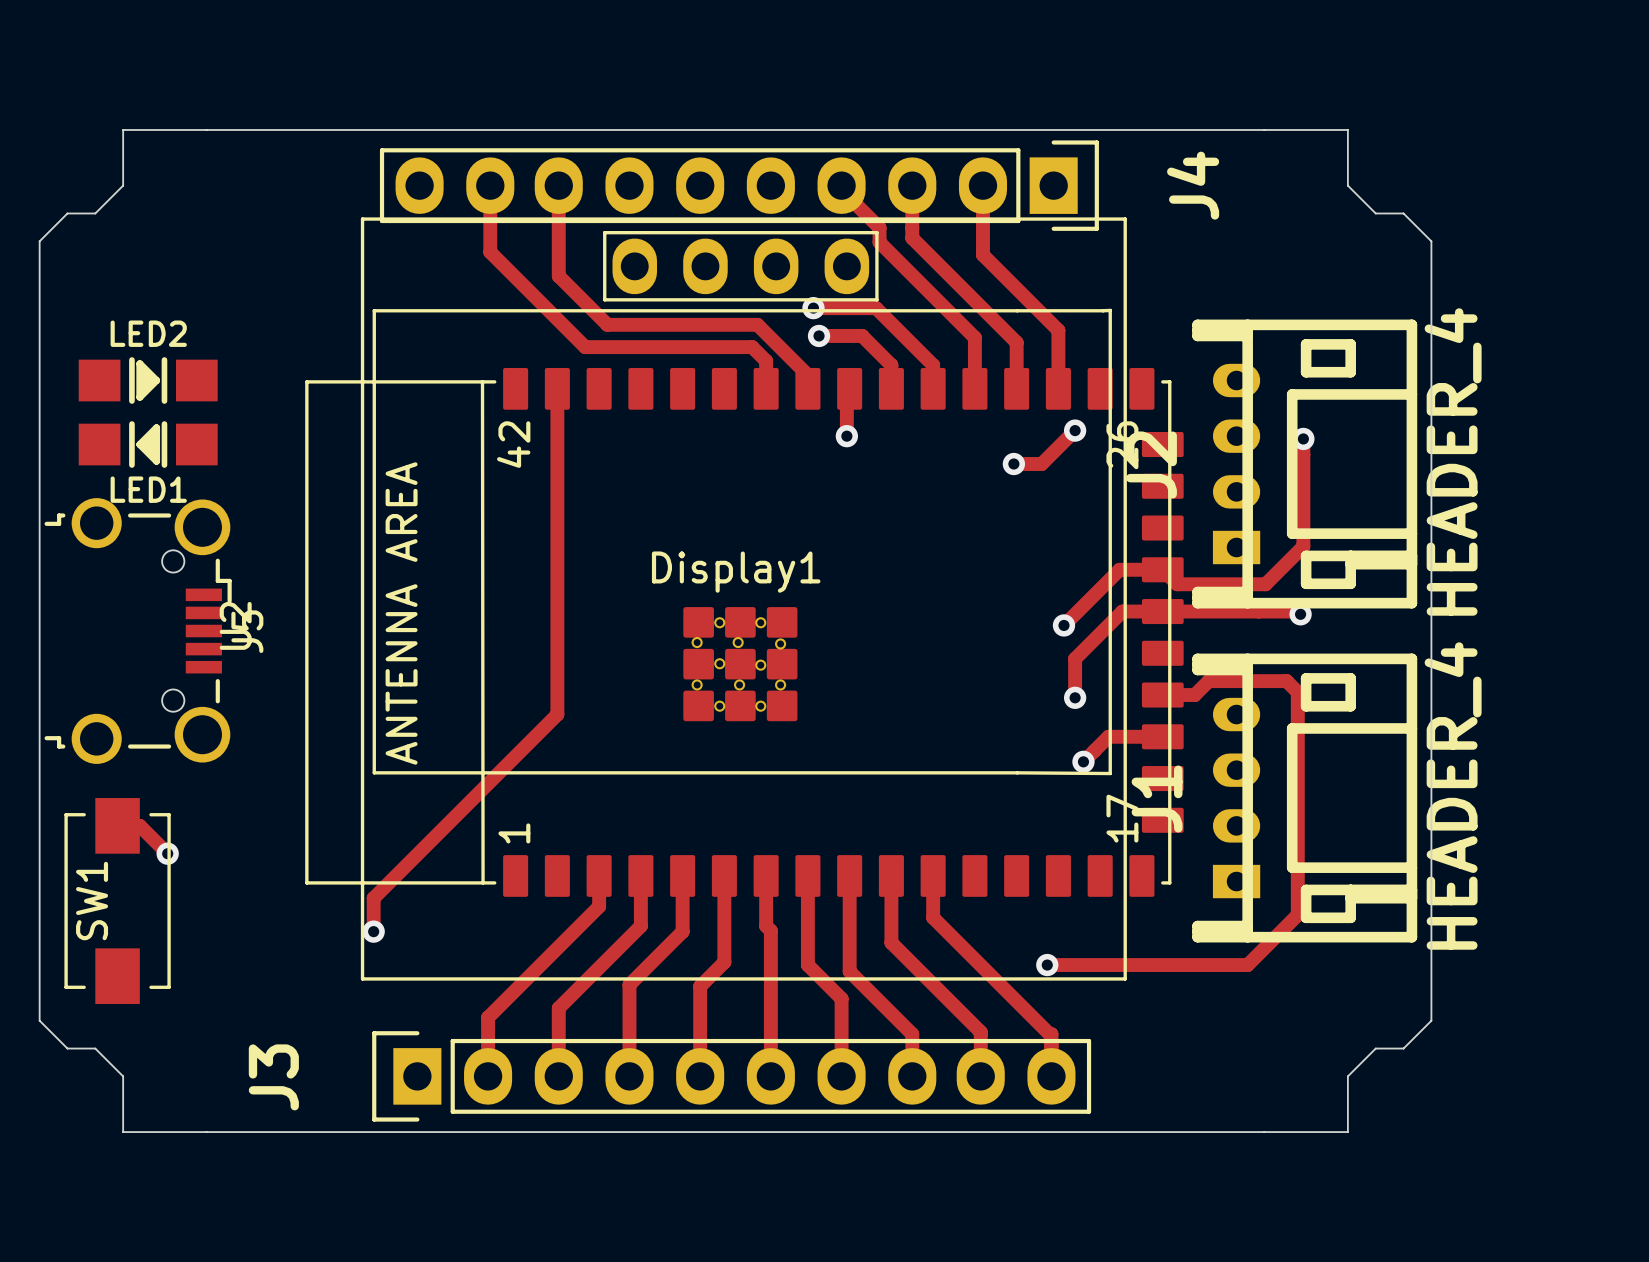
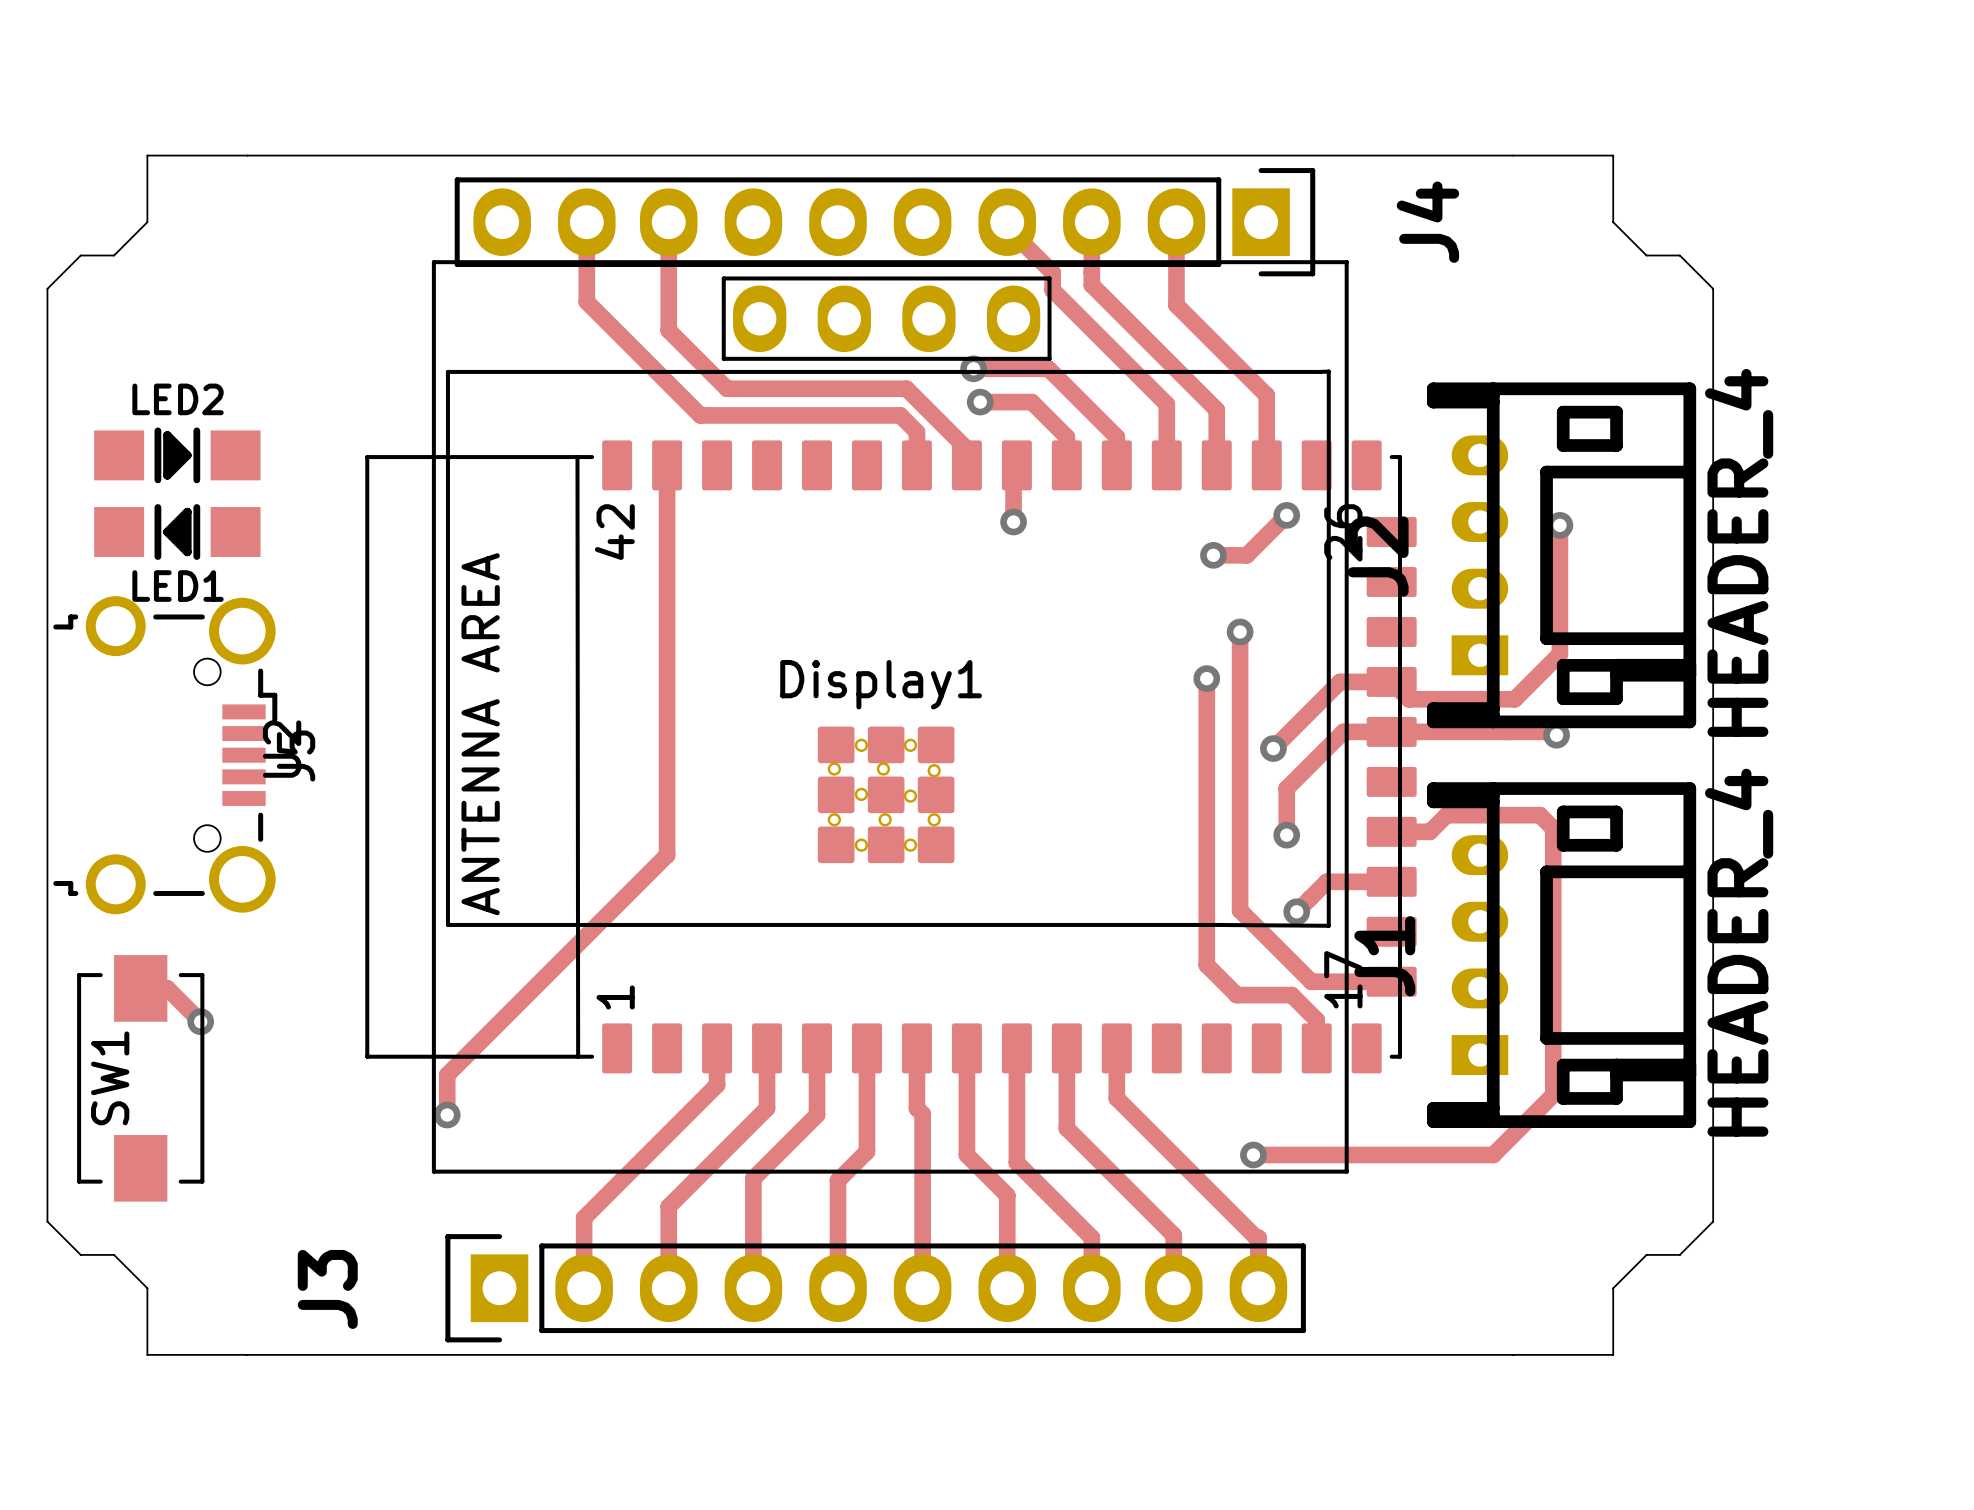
track: none -> (1240, 631) (1240, 910) (1311, 981) (1391, 981)
via: none -> (1240, 631)
track: none -> (1206, 678) (1206, 965) (1236, 995) (1291, 995) (1316, 1020) (1316, 1048)
via: none -> (1206, 678)

